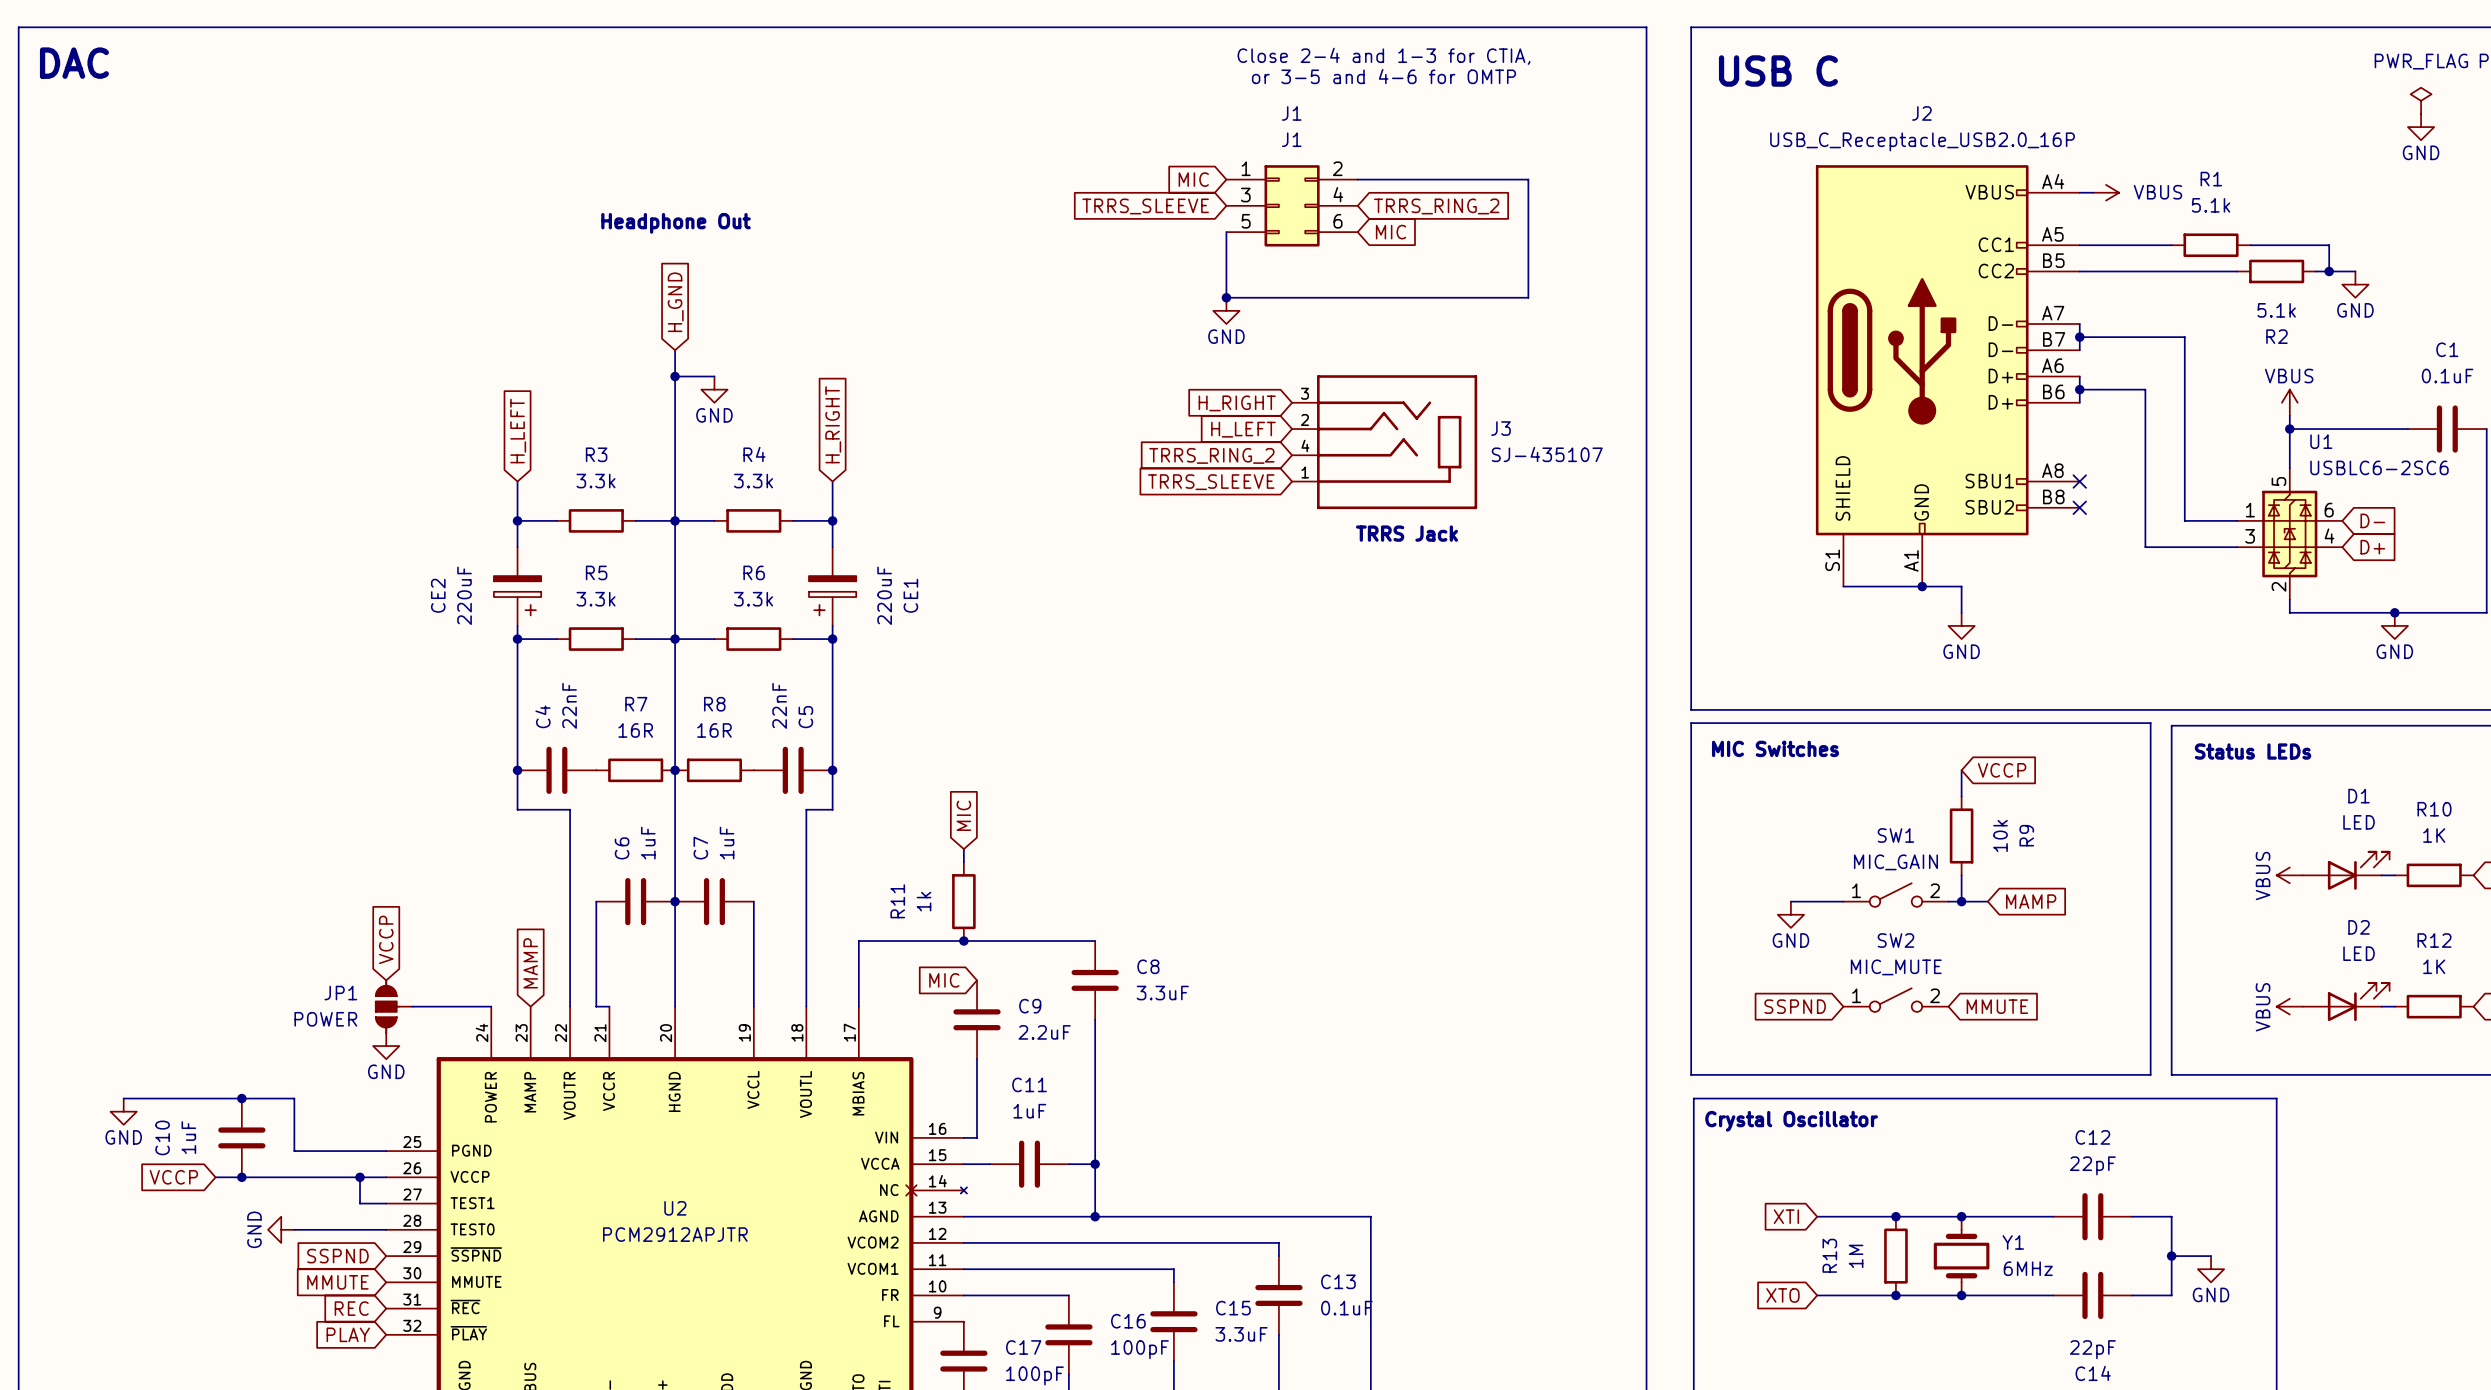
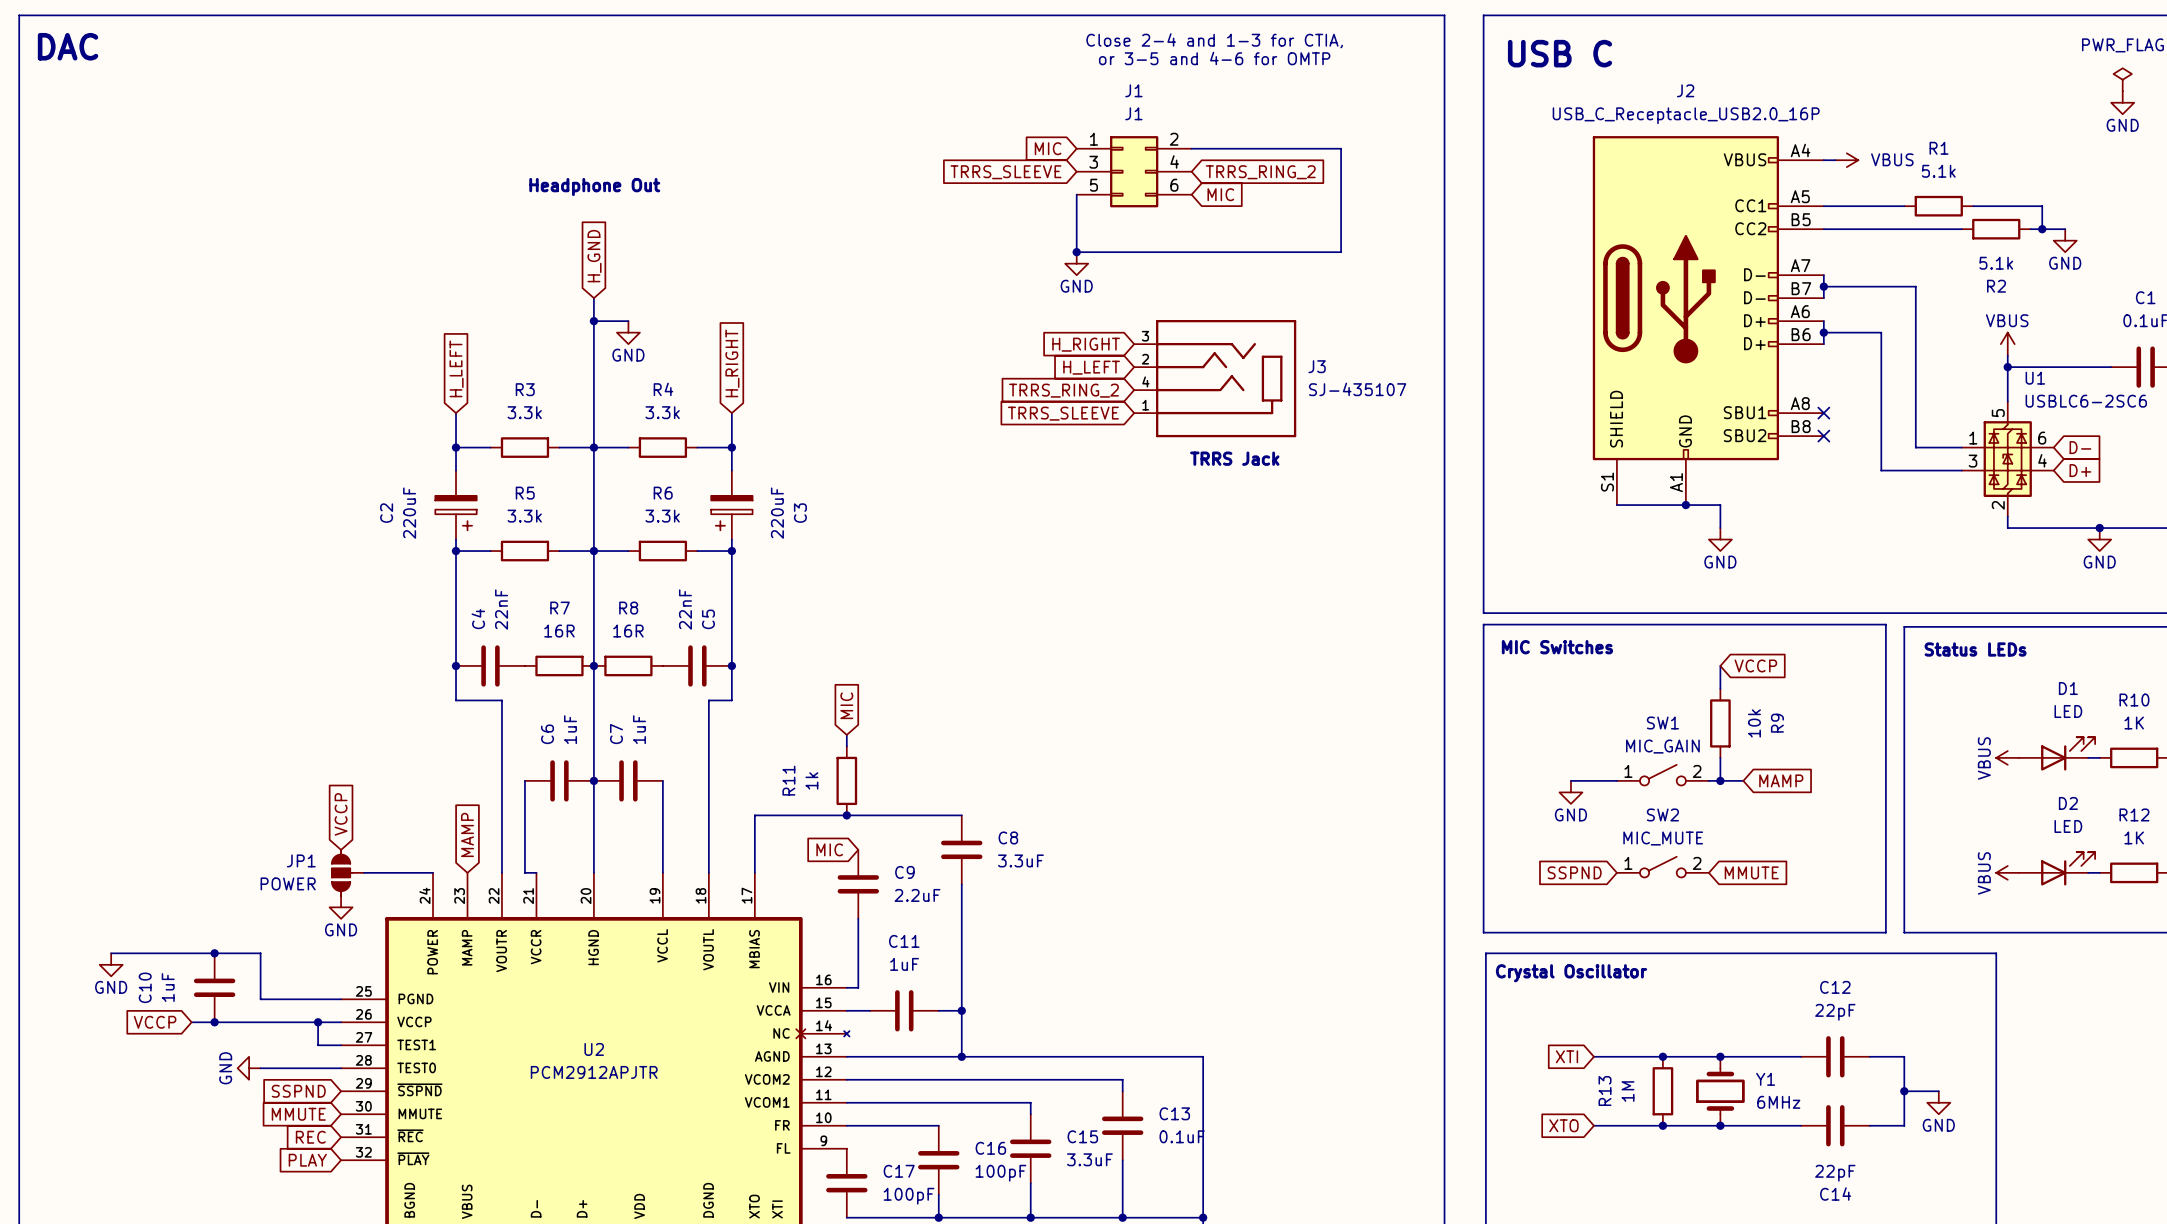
CE2 name: CE2 (438, 595) -> C2 (386, 513)
CE1 name: CE1 (910, 595) -> C3 (800, 513)

